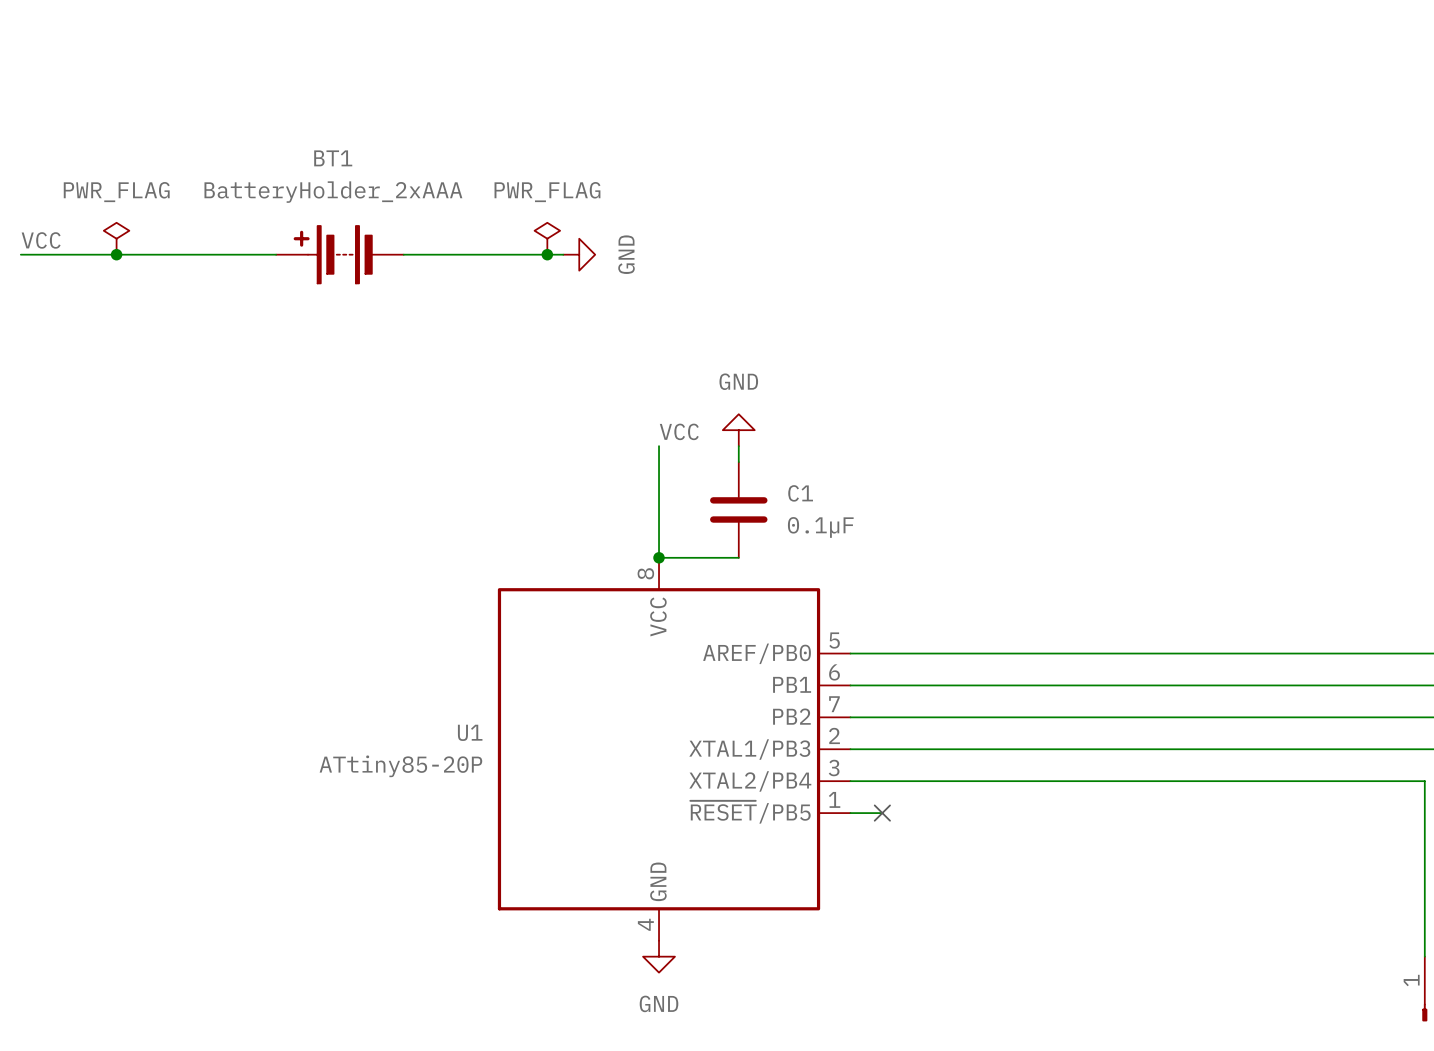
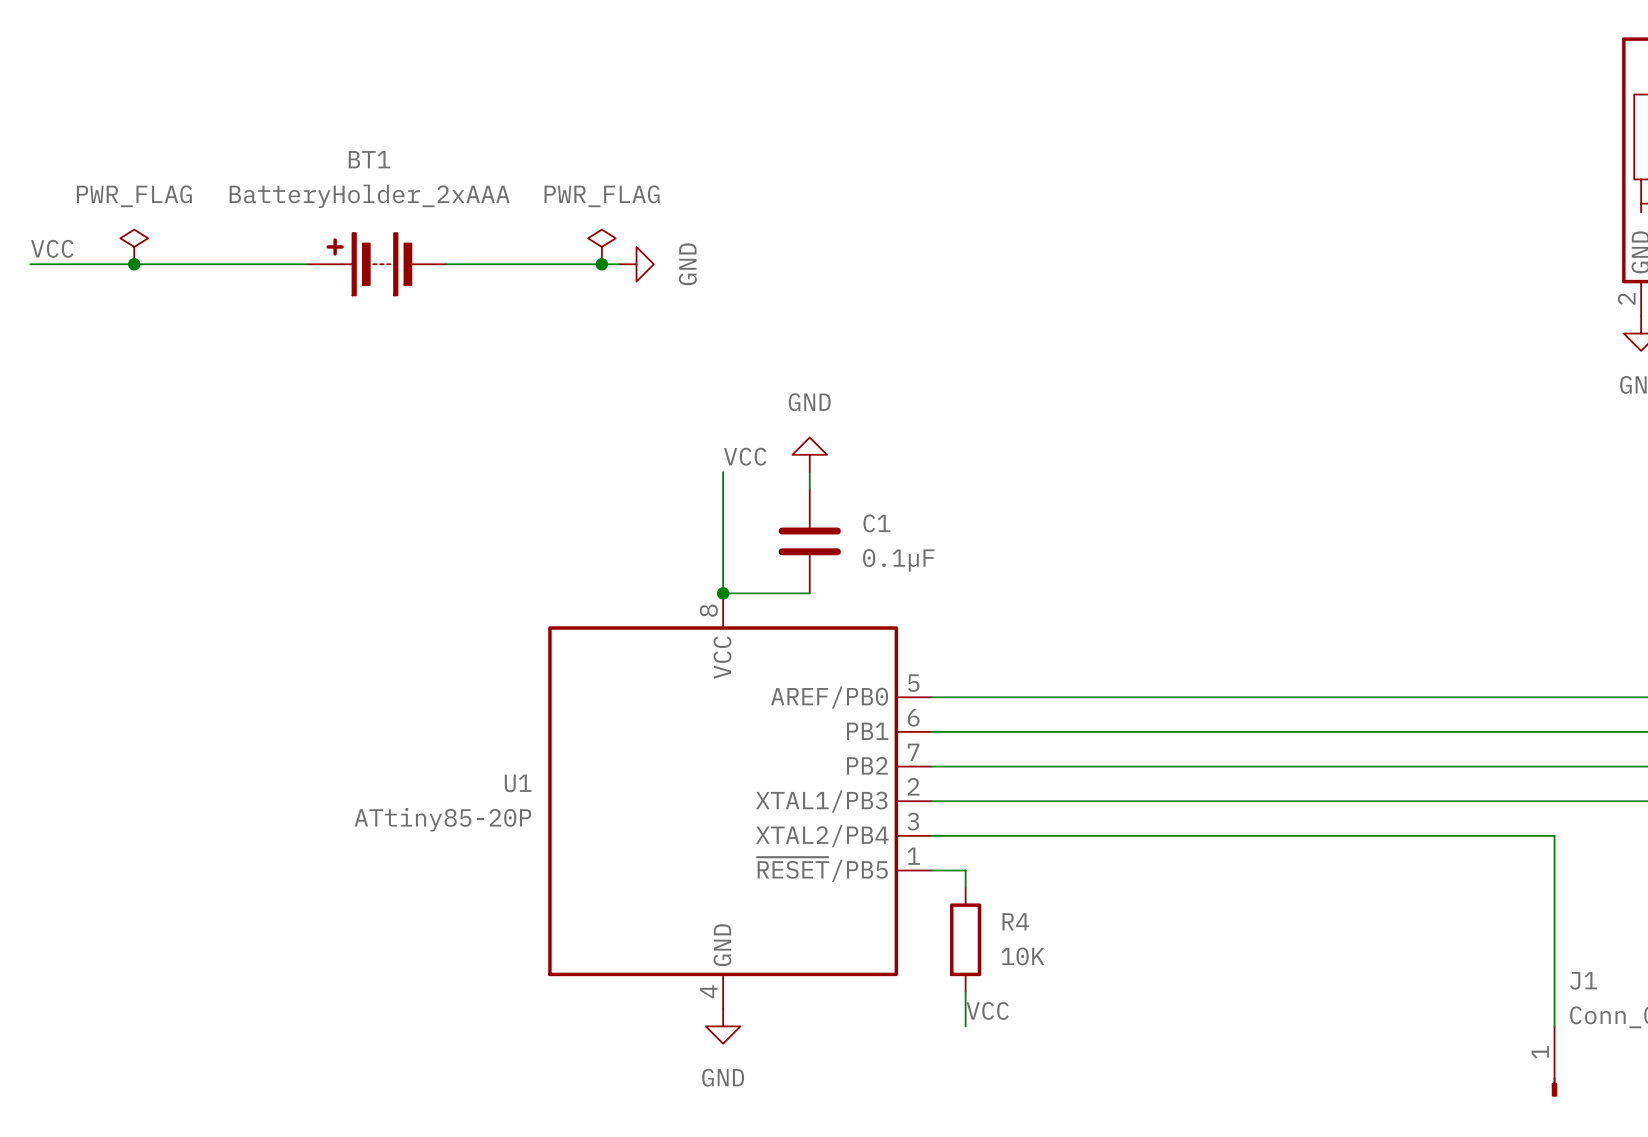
wire: none -> (965, 870) (965, 887)
no-connect mark: (882, 813) -> none
R4: none -> 10K (965, 939)
wire: none -> (965, 991) (965, 1026)
label: none -> VCC (987, 1010)

